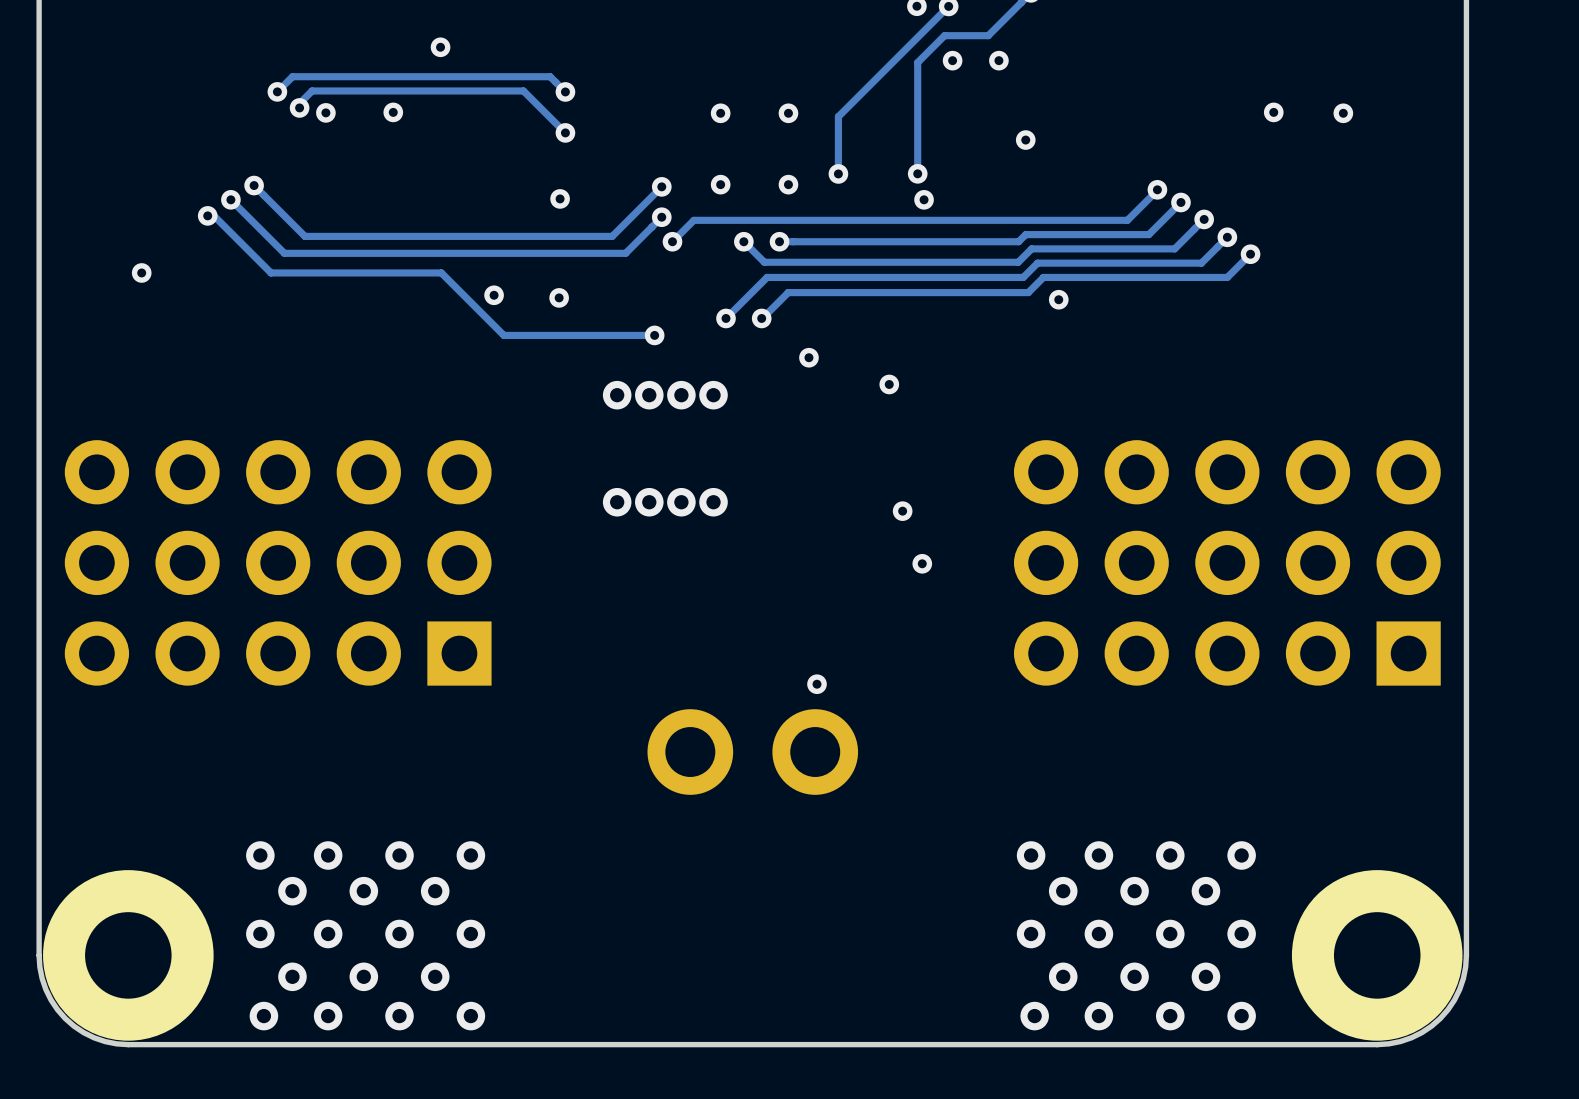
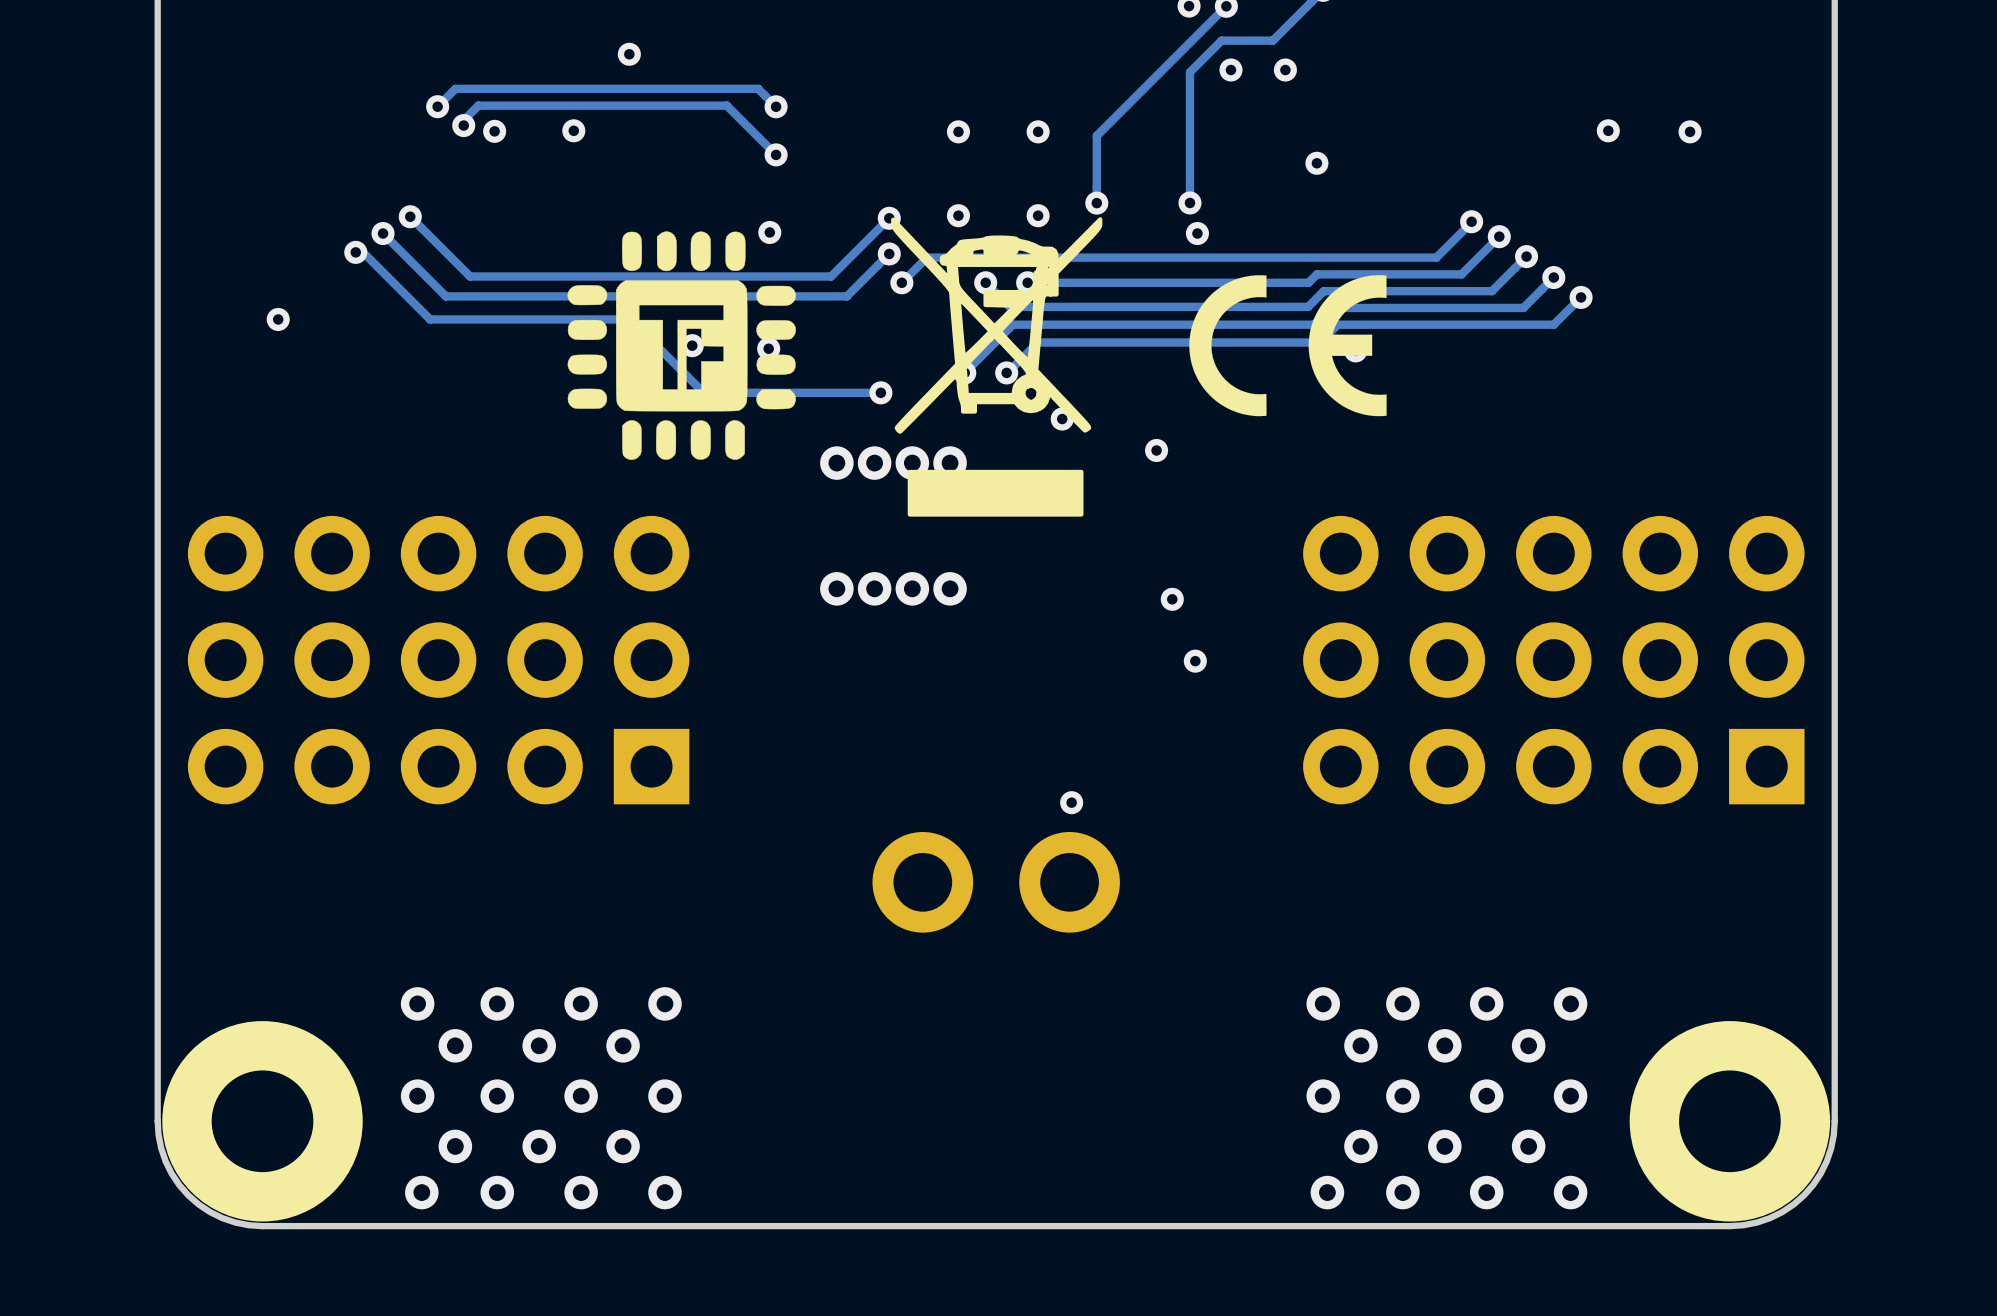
drawing: none -> [891, 217, 1103, 517]
drawing: none -> [567, 231, 796, 460]
drawing: none -> [1189, 275, 1387, 417]

